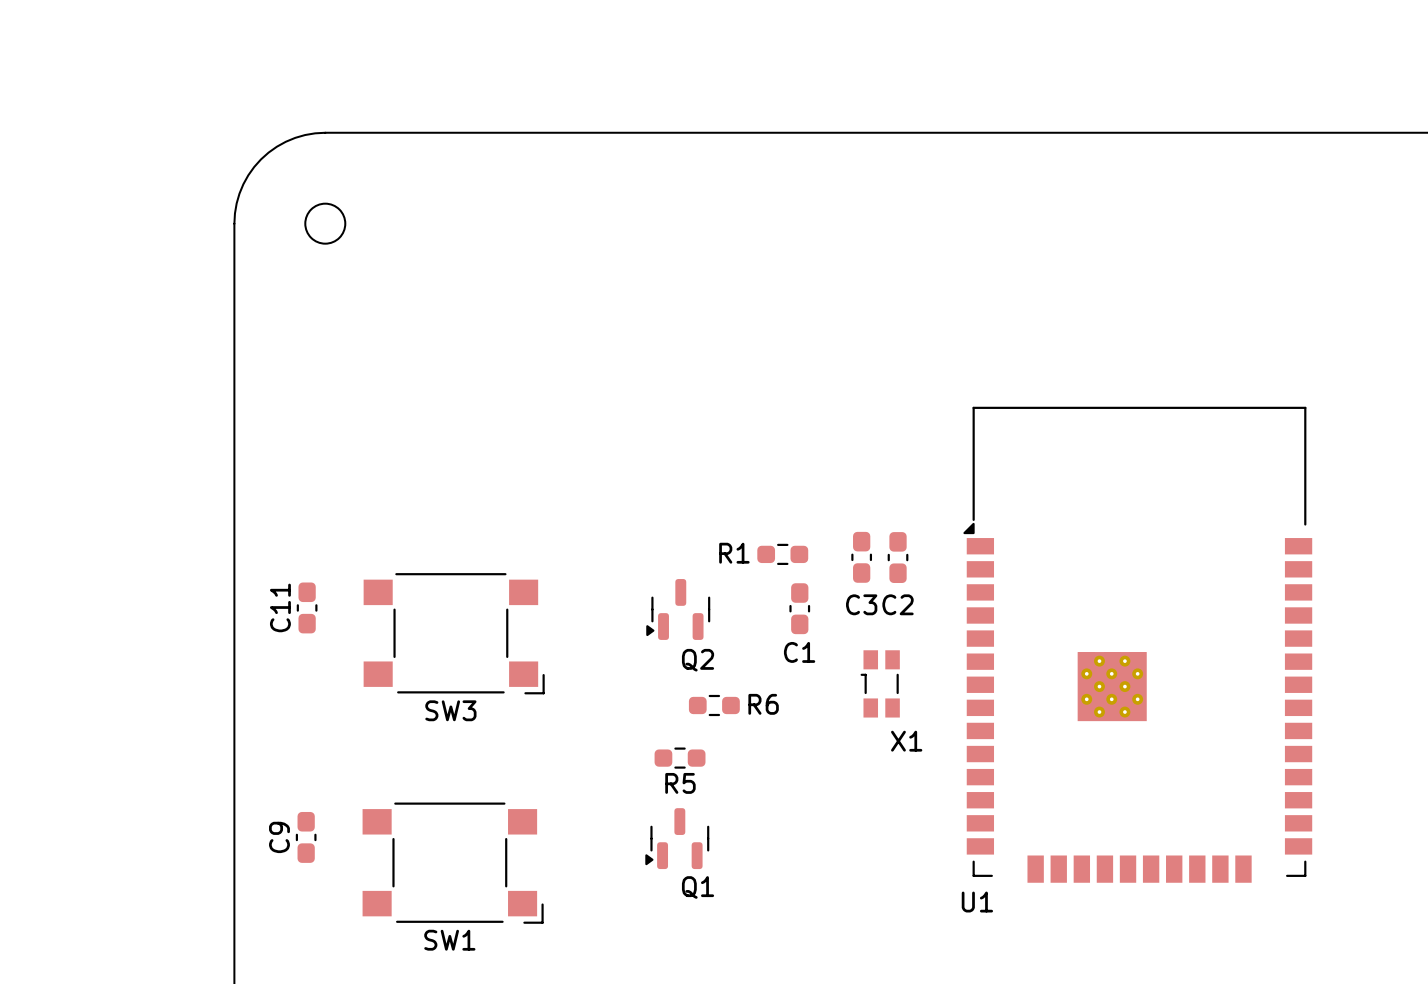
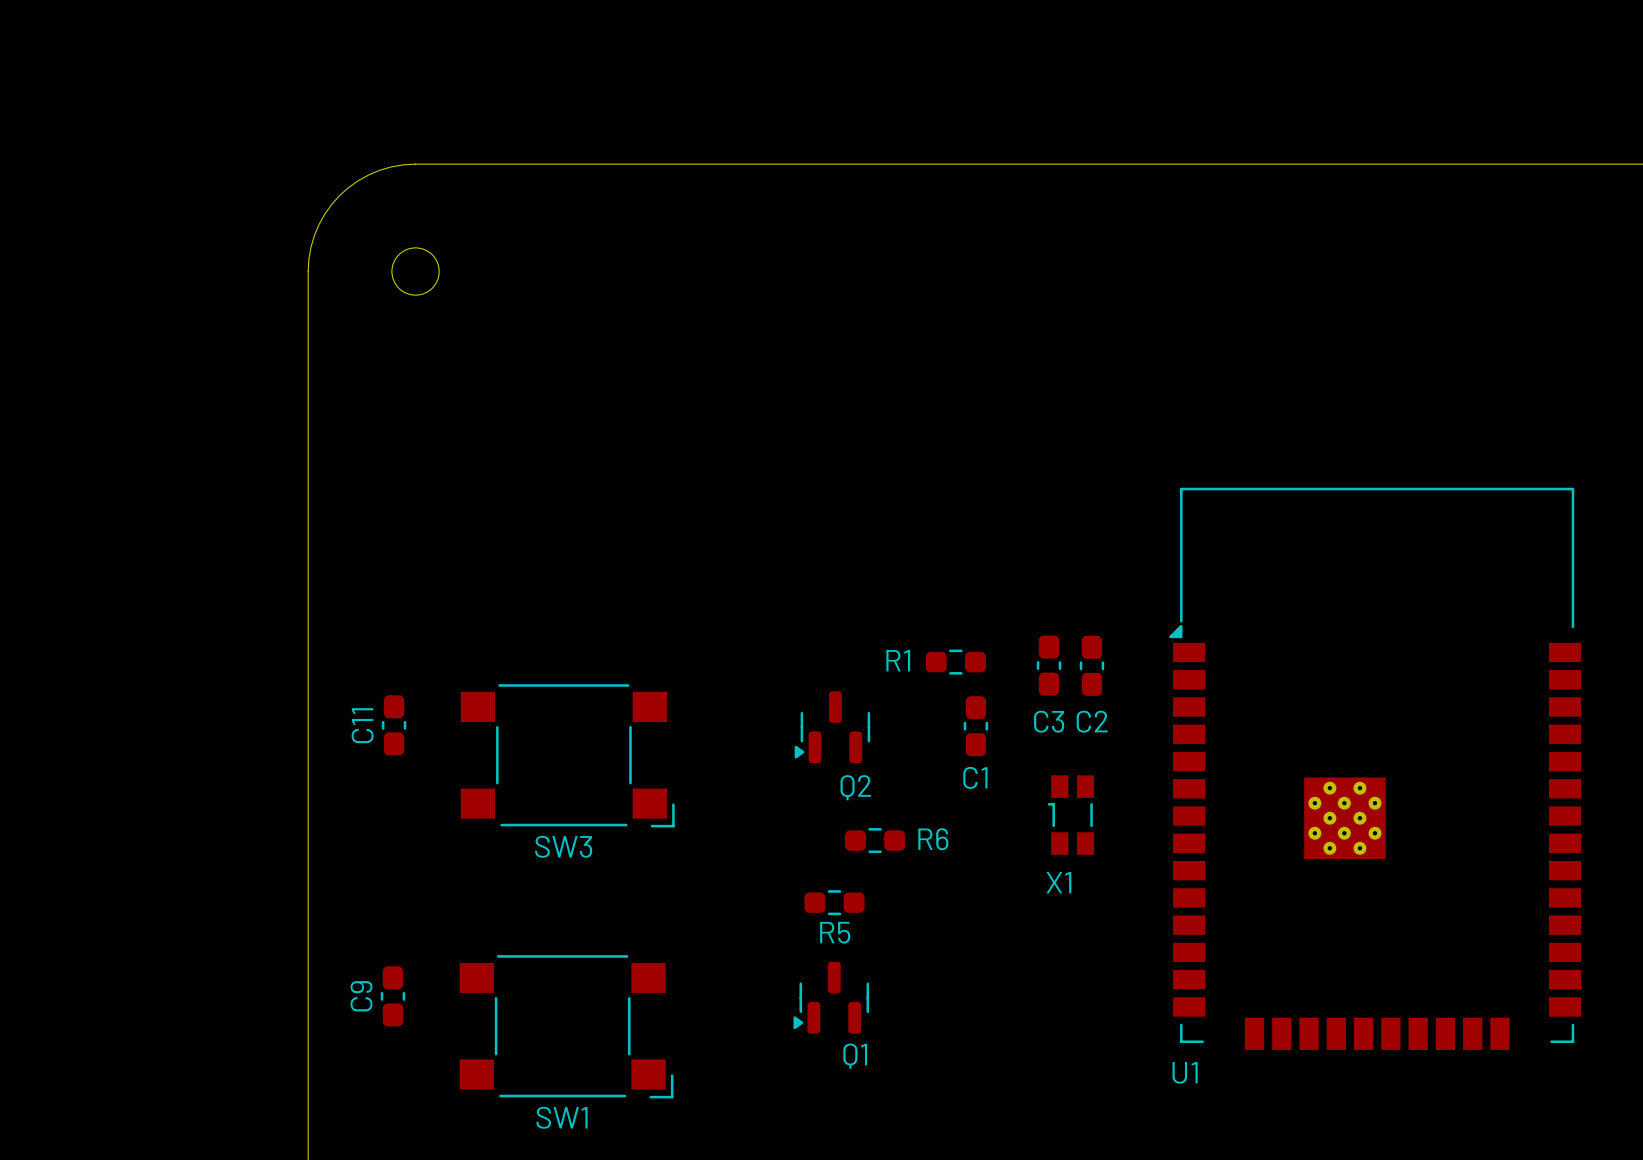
X1 name position: X1 (906, 741) -> X1 (1058, 882)

